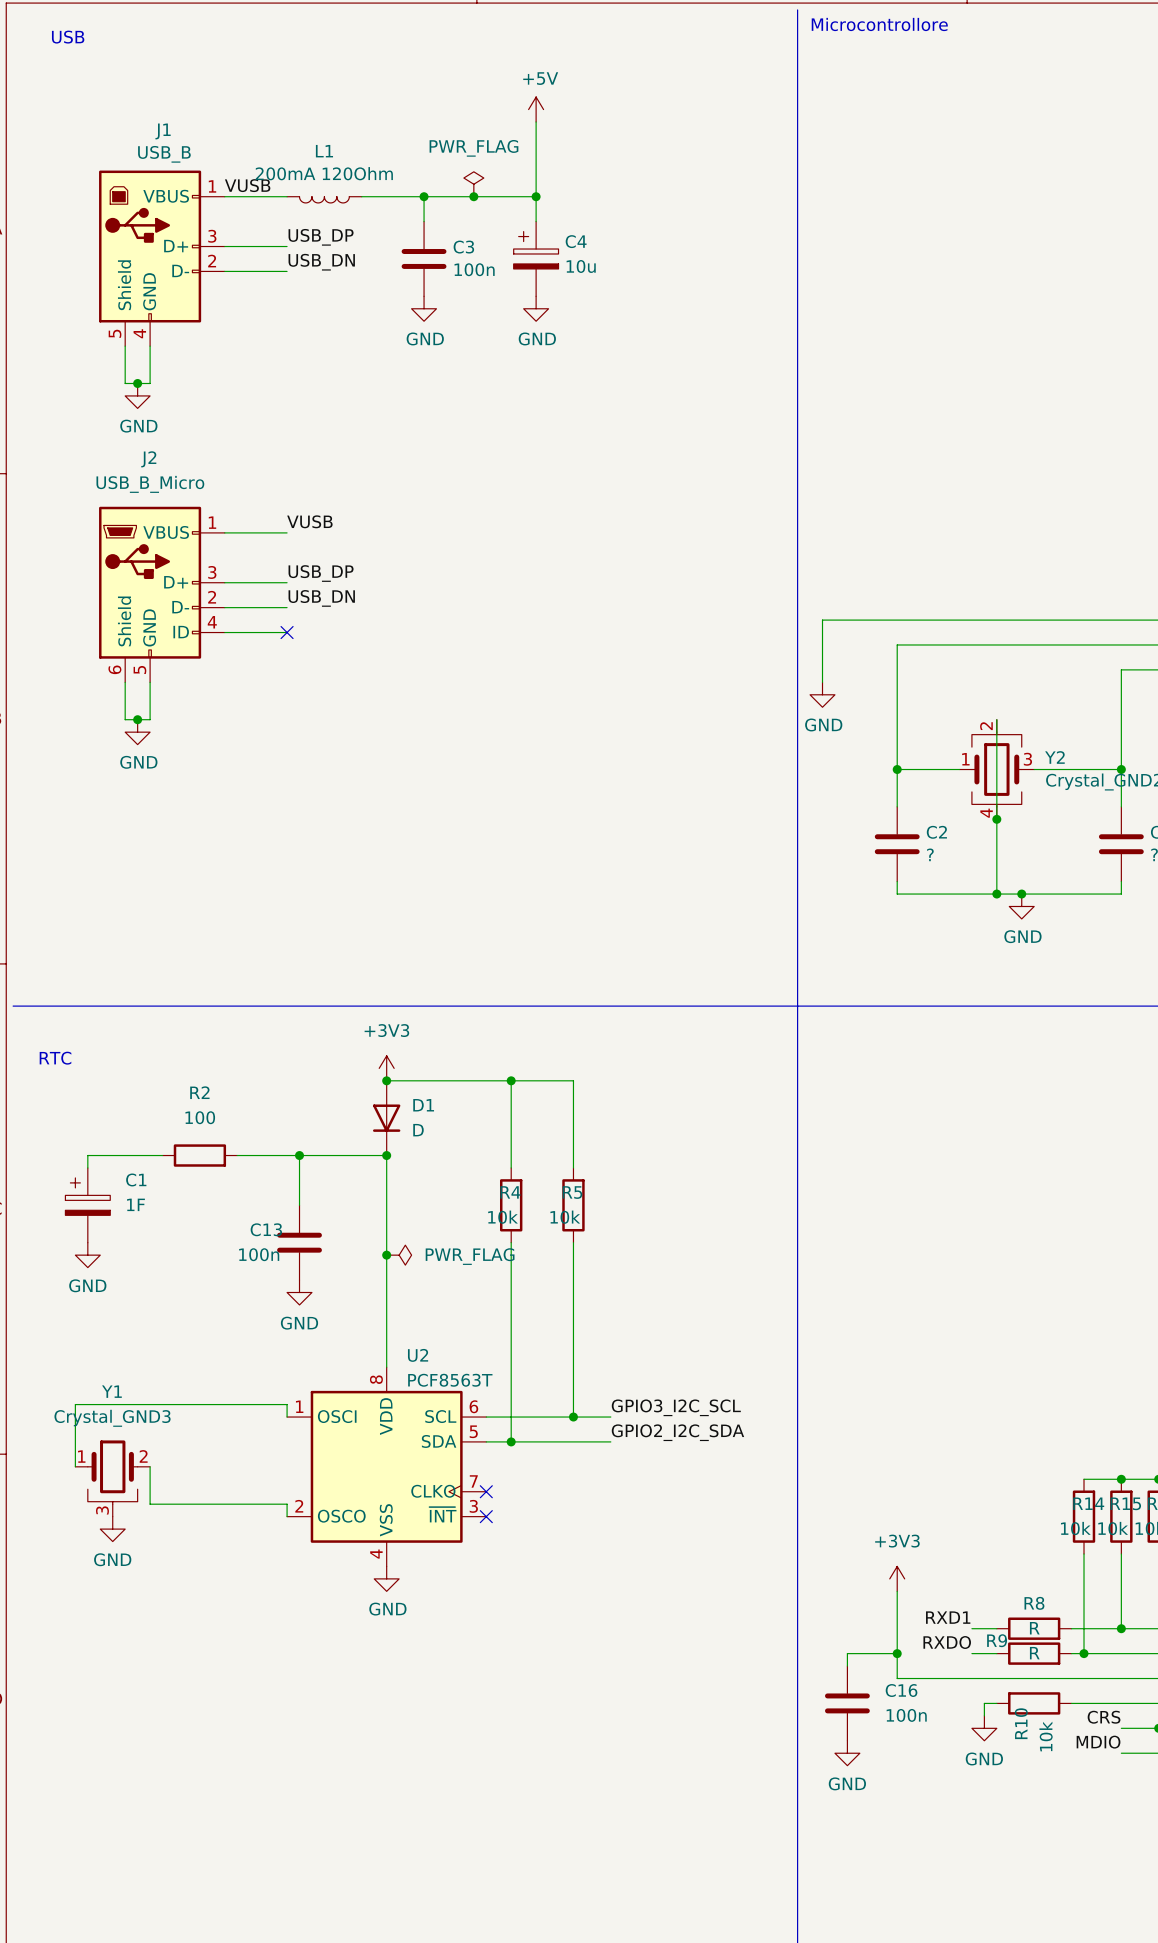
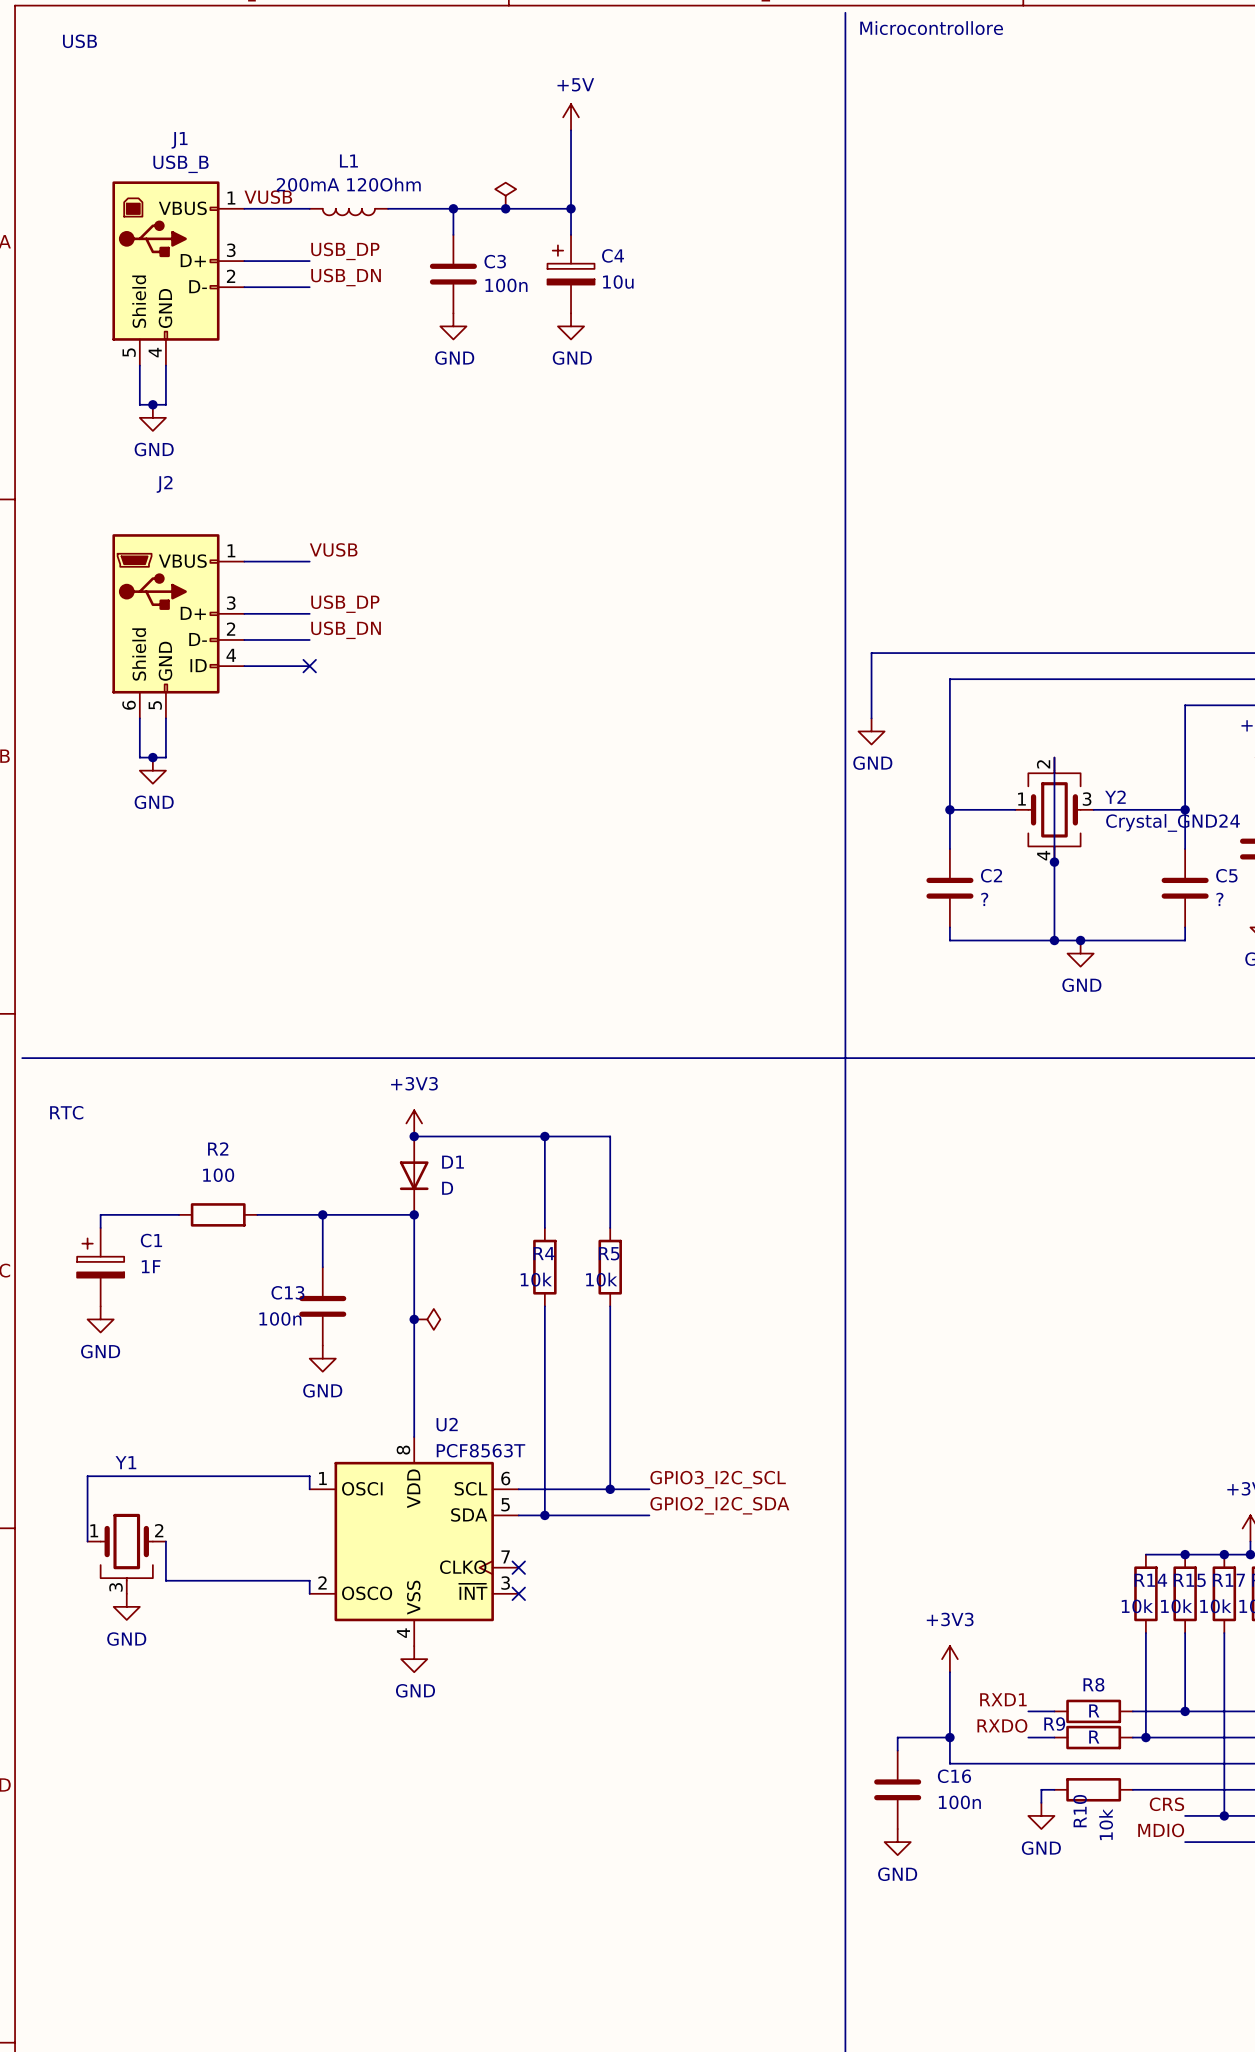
power symbol text: PWR_FLAG (473, 148) -> none
J2 value: USB_B_Micro (150, 484) -> none
power symbol text: PWR_FLAG (470, 1256) -> none
Y1 value: Crystal_GND3 (112, 1418) -> none

